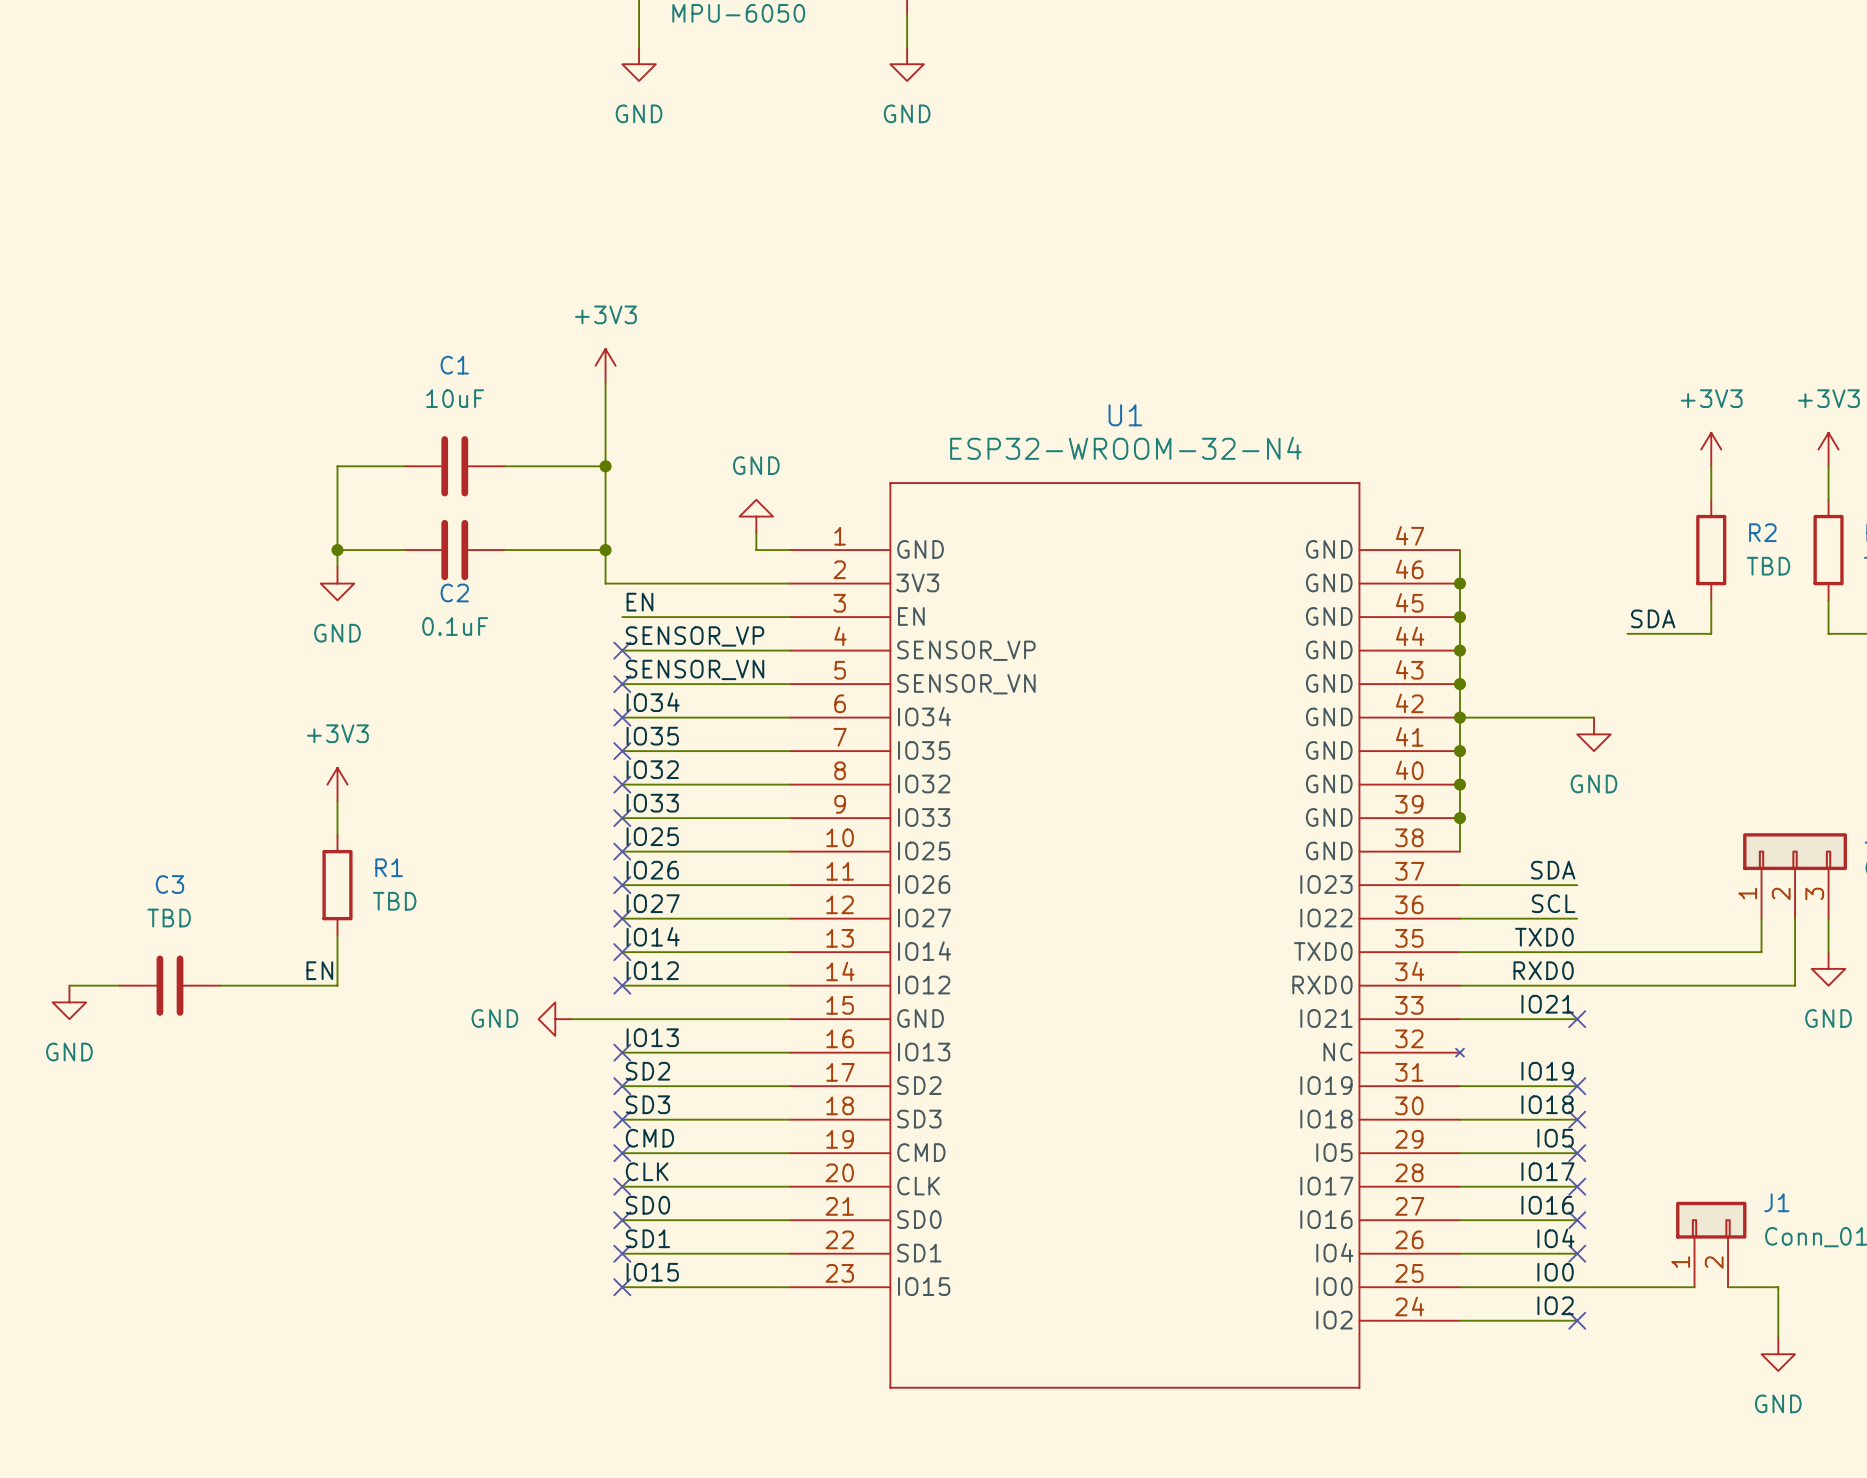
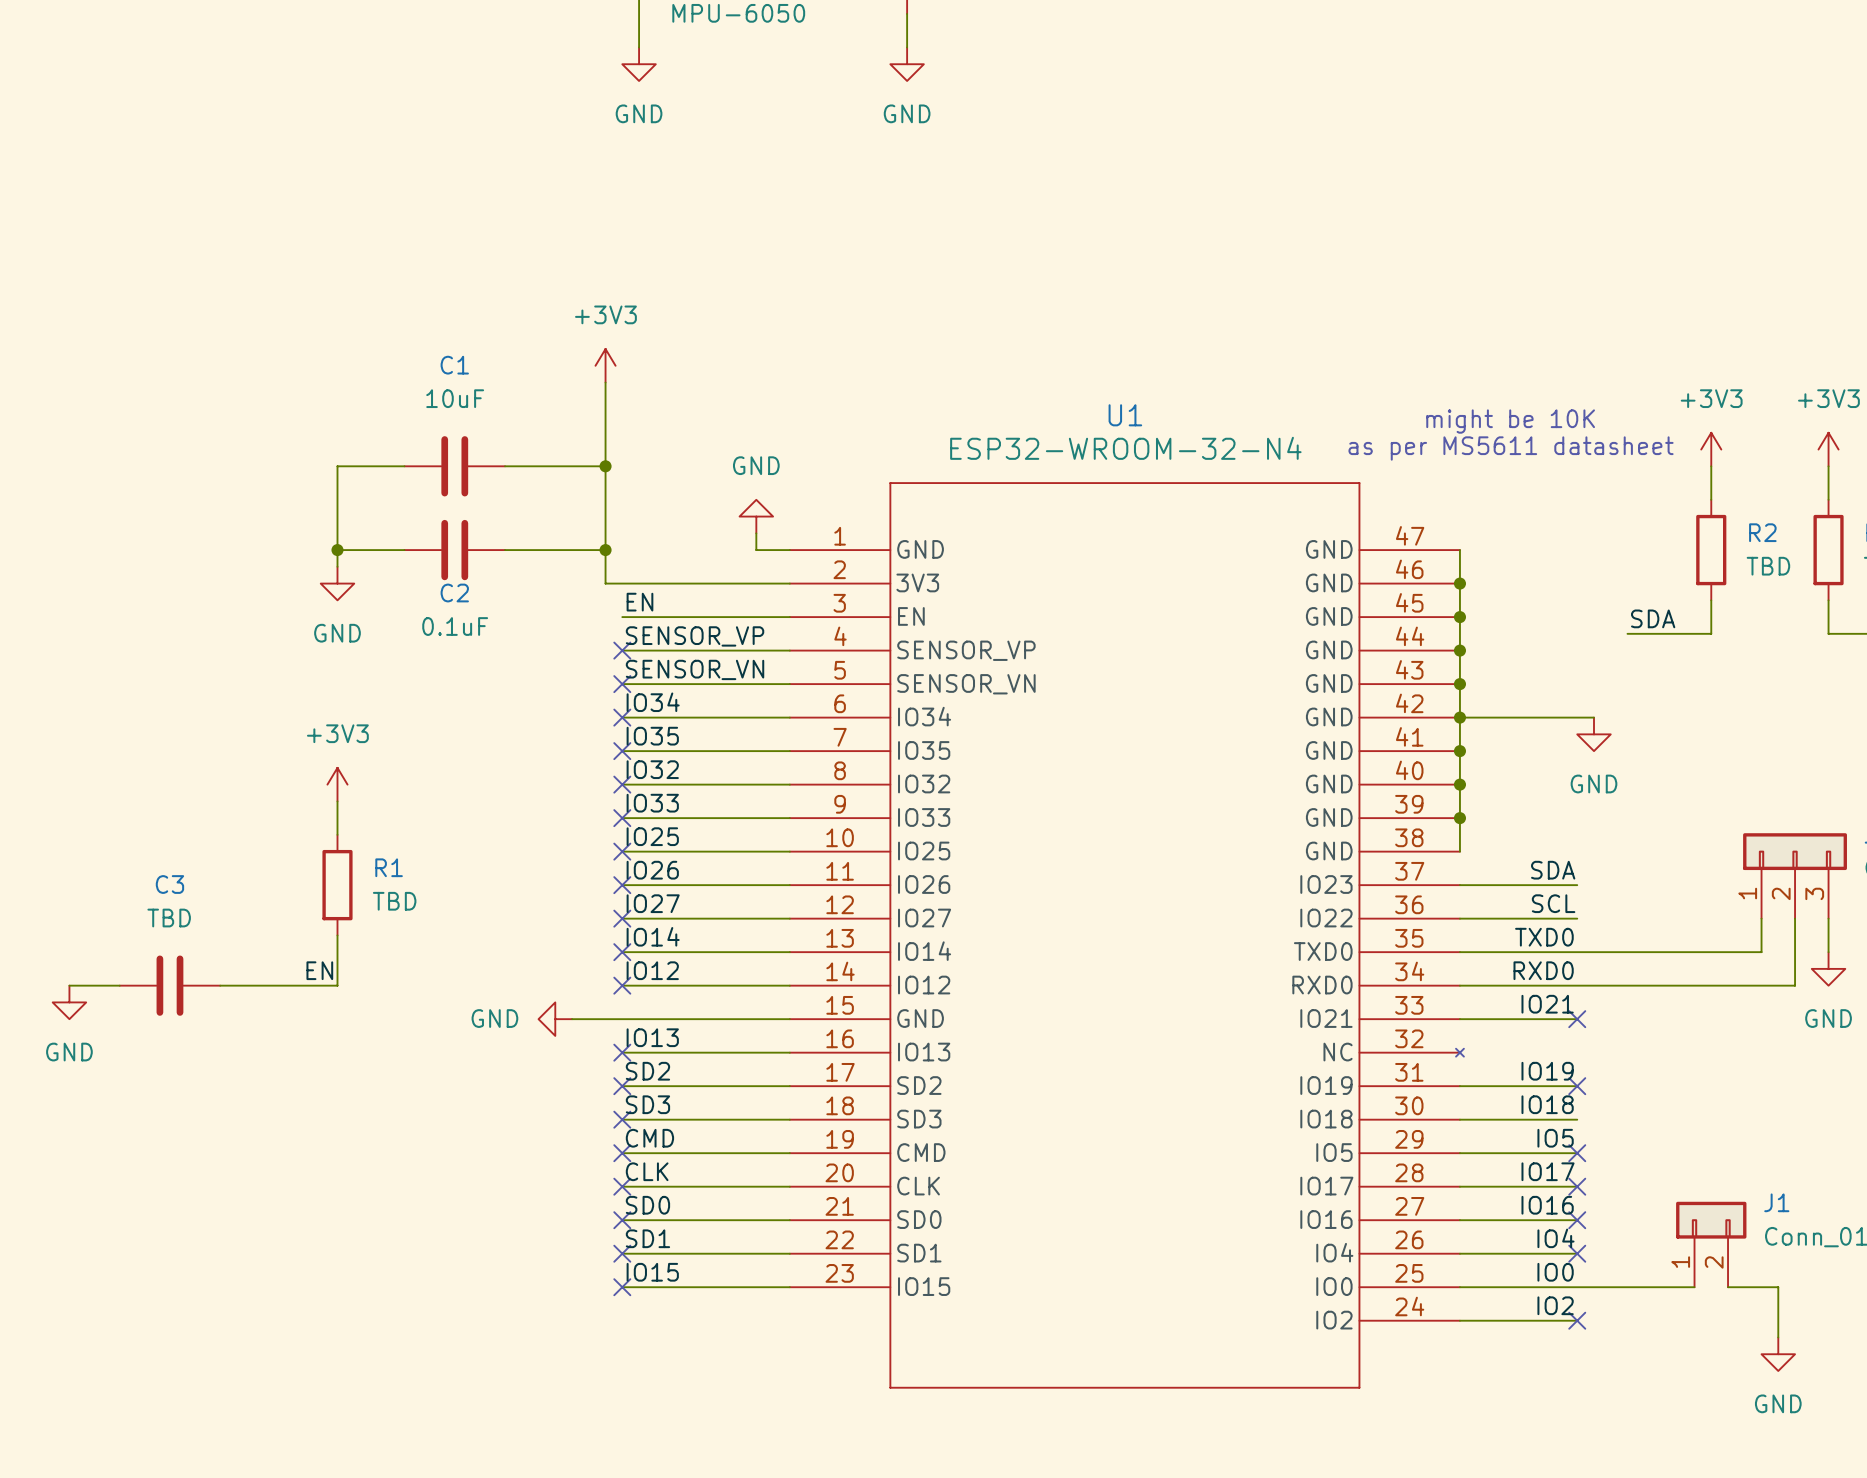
text: none -> might be 10K (1510, 421)
text: none -> as per MS5611 datasheet (1511, 448)
no-connect mark: (1577, 1119) -> none

